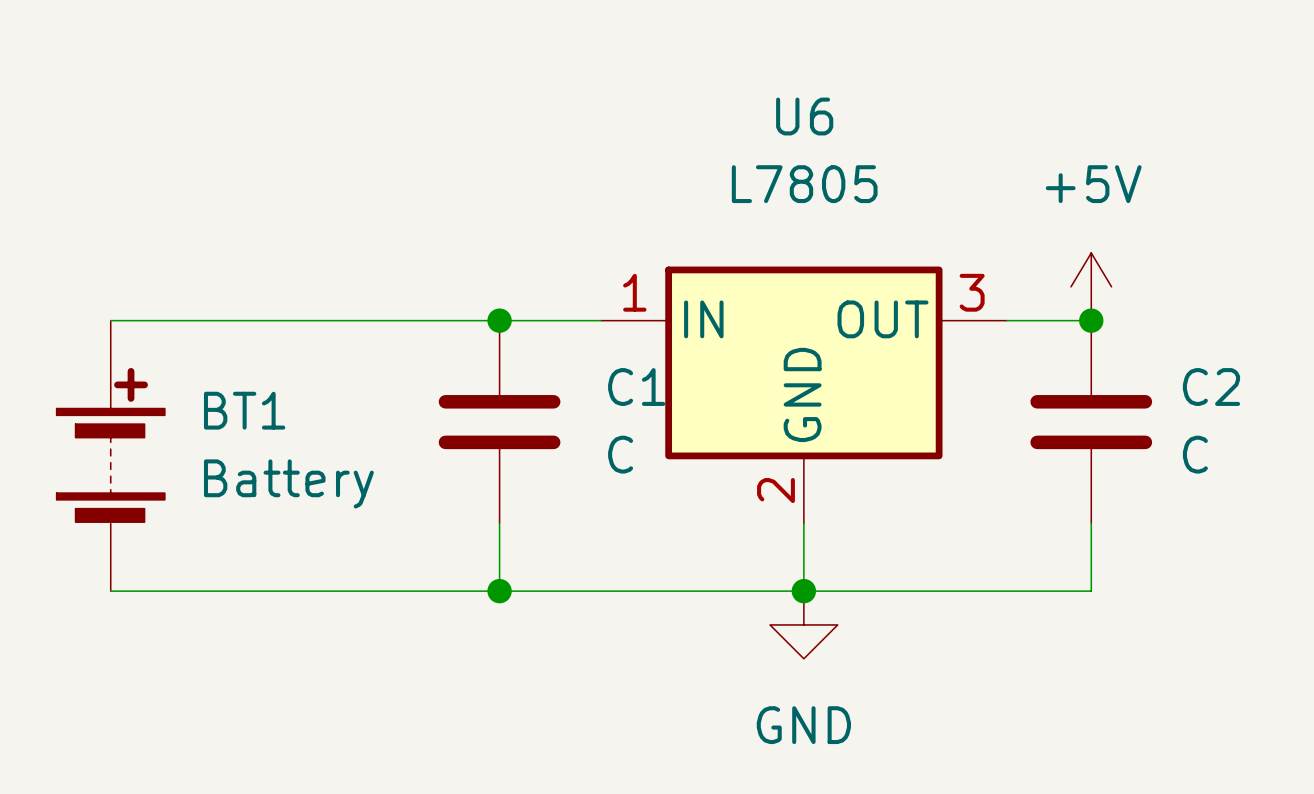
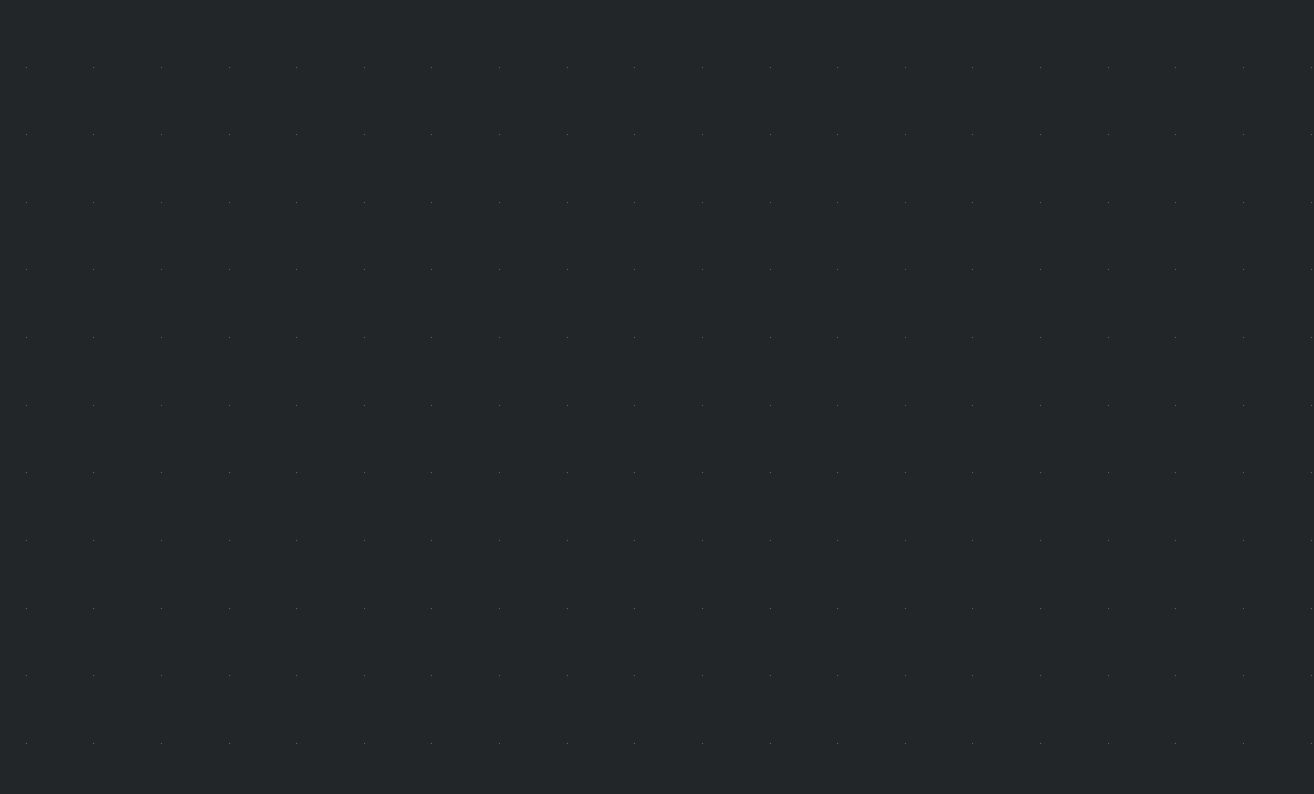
power symbol: +5V (1091, 286) -> none
wire: (110, 320) (601, 320) -> none
junction: (499, 320) -> none
wire: (1006, 320) (1091, 320) -> none
junction: (1091, 320) -> none
U6: L7805 (803, 395) -> none
C1: C (499, 422) -> none
C2: C (1091, 422) -> none
BT1: Battery (110, 455) -> none
wire: (499, 523) (499, 591) -> none
wire: (803, 523) (803, 591) -> none
wire: (1091, 523) (1091, 591) (110, 591) -> none
junction: (499, 591) -> none
junction: (803, 591) -> none
power symbol: GND (803, 624) -> none

